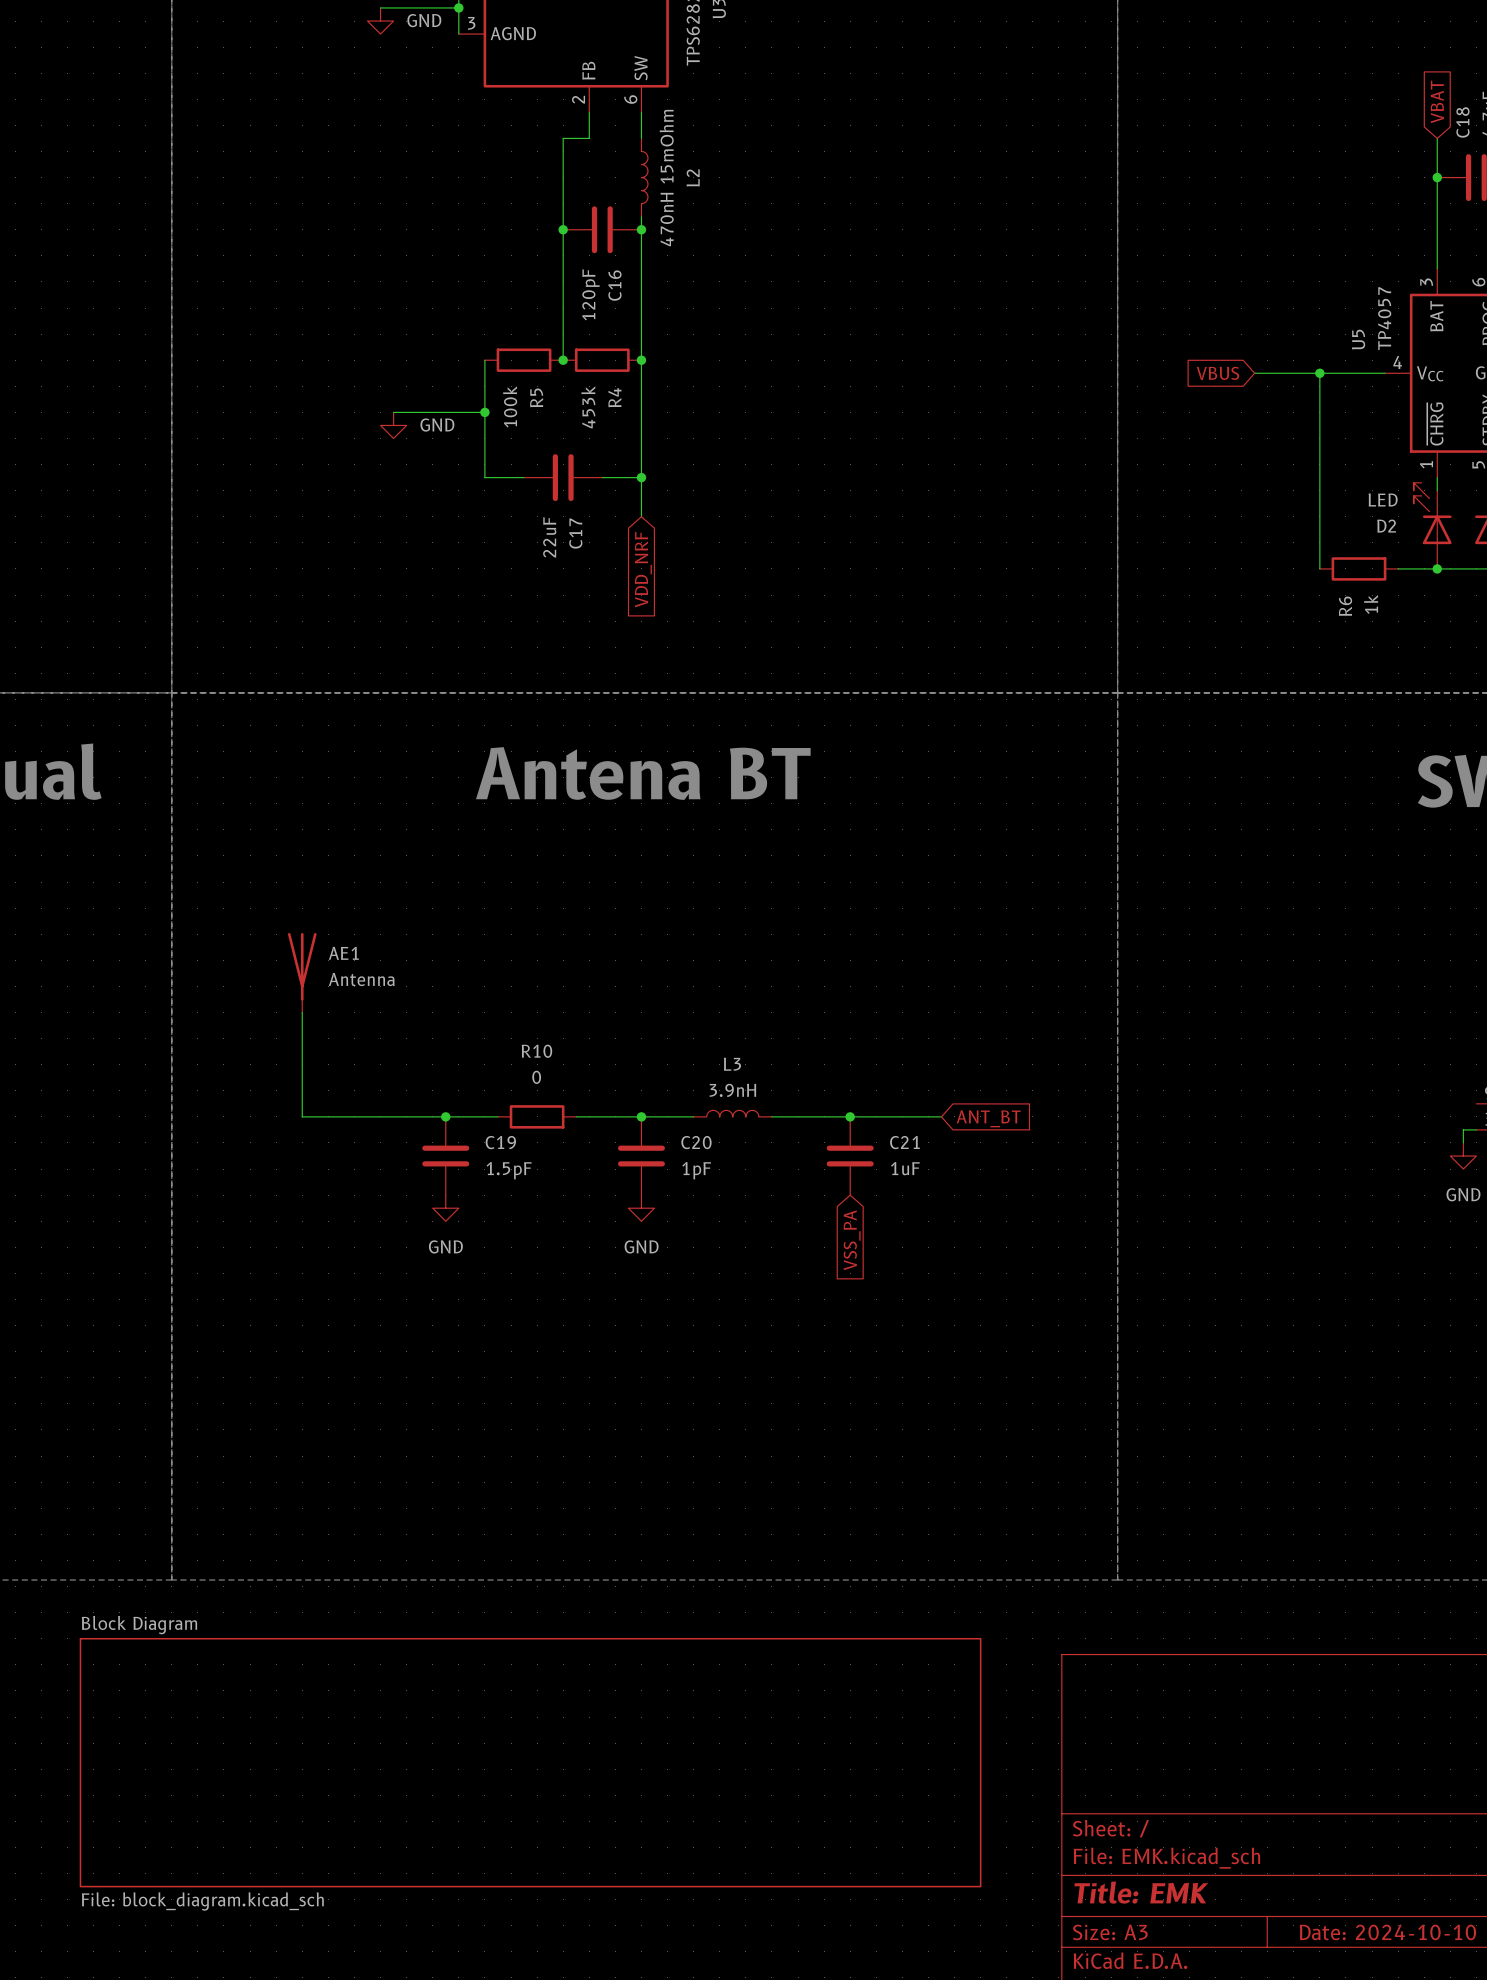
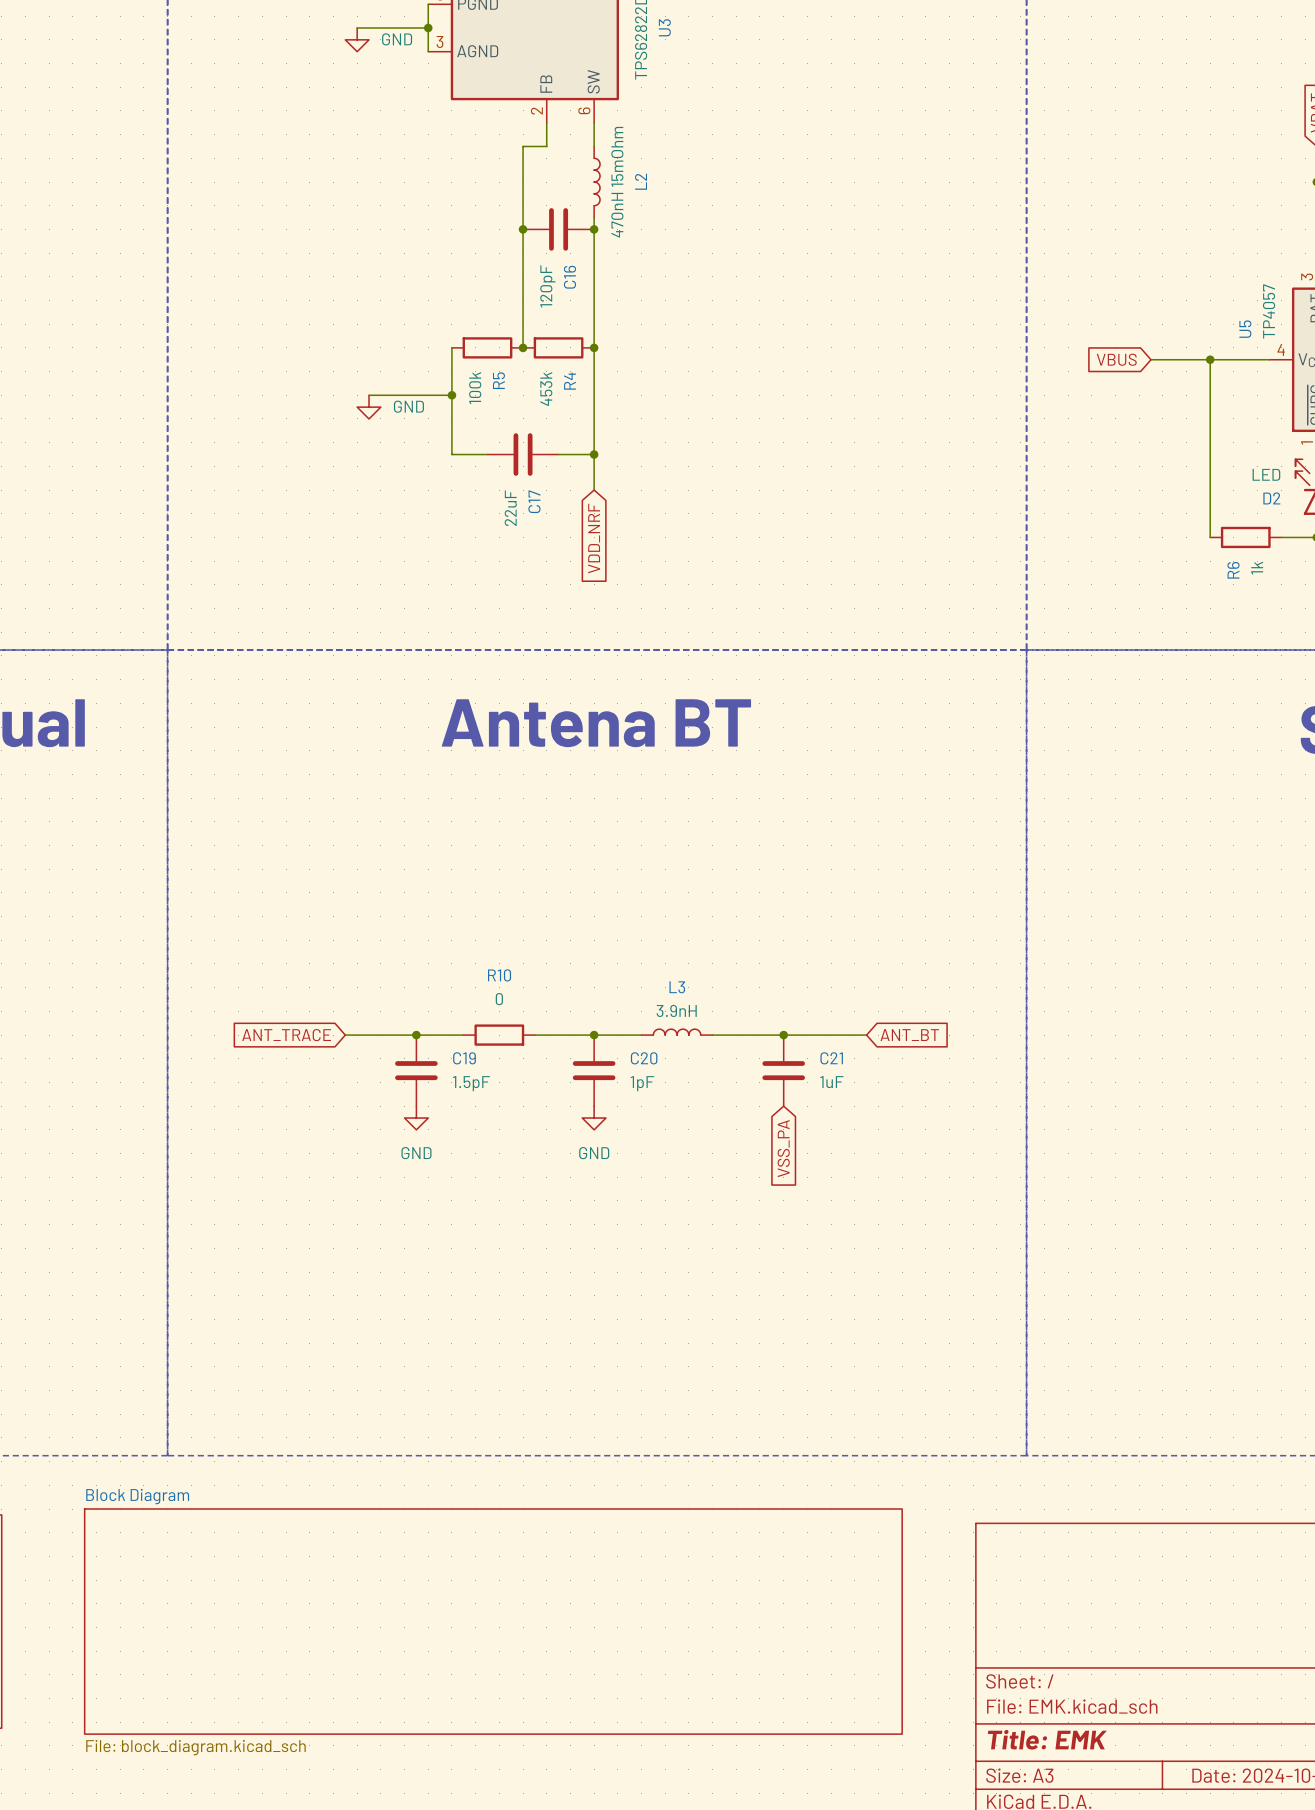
AE1: Antenna (302, 972) -> none
wire: (302, 1012) (302, 1116) (367, 1116) -> none
global label: none -> ANT_TRACE (286, 1035)

